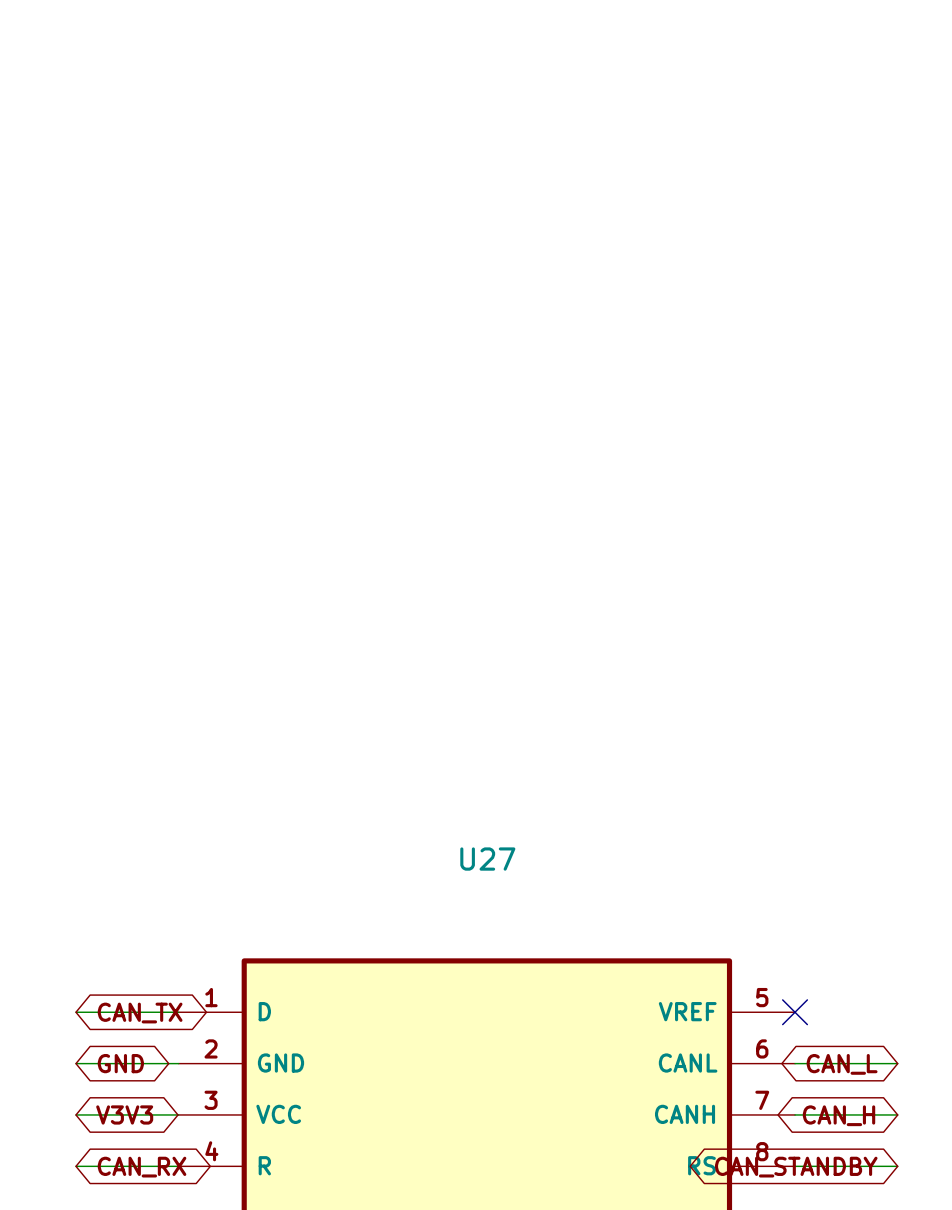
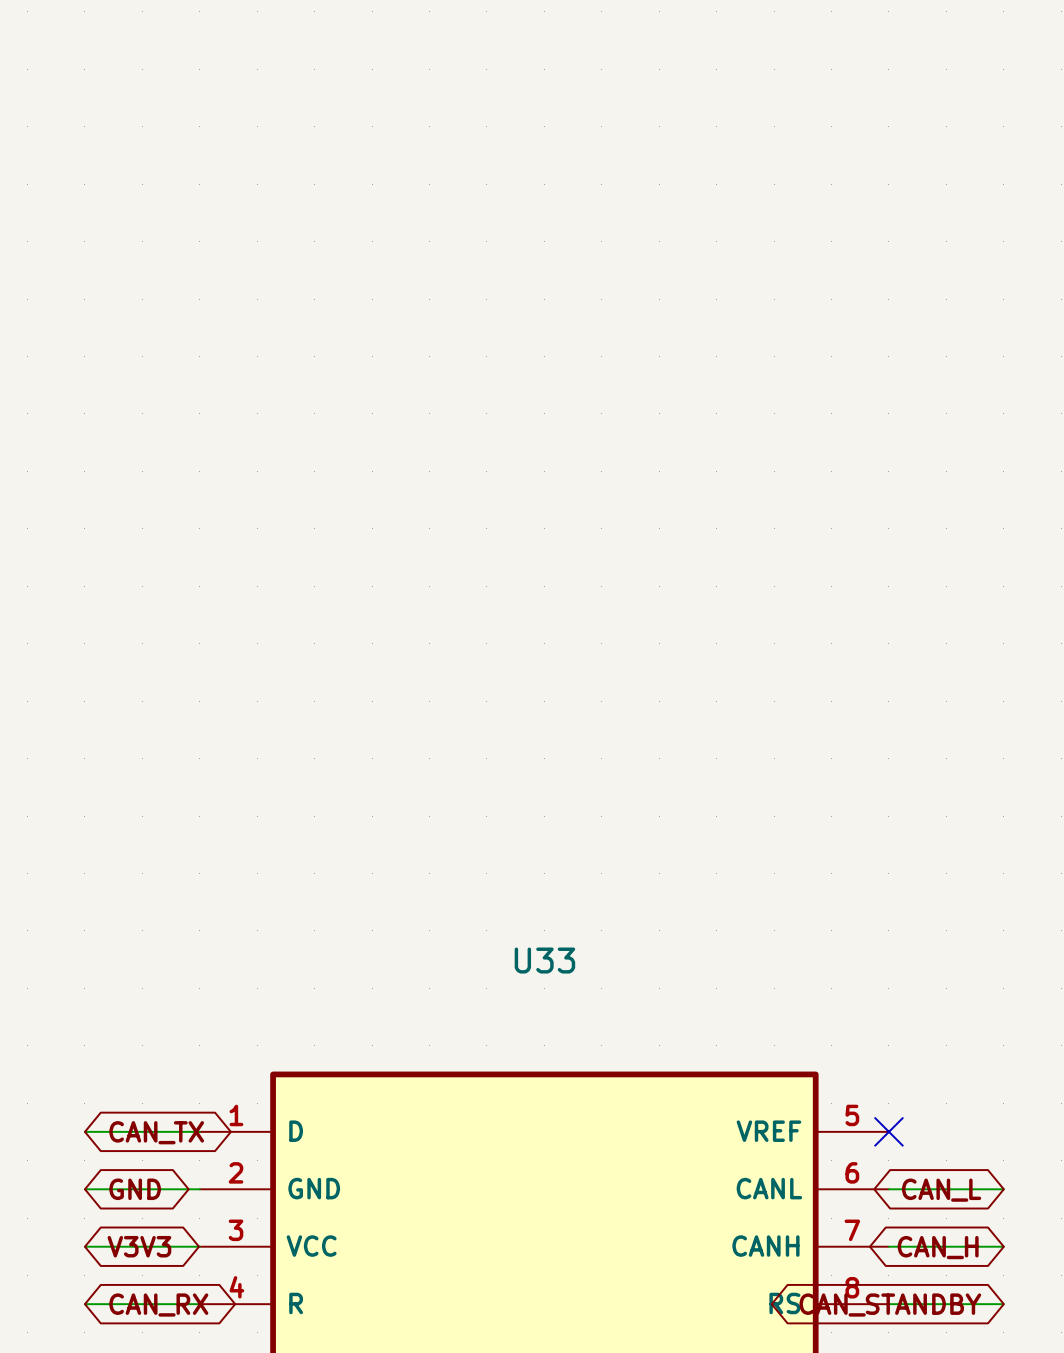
U27 name: U27 (487, 859) -> U33 (544, 960)

